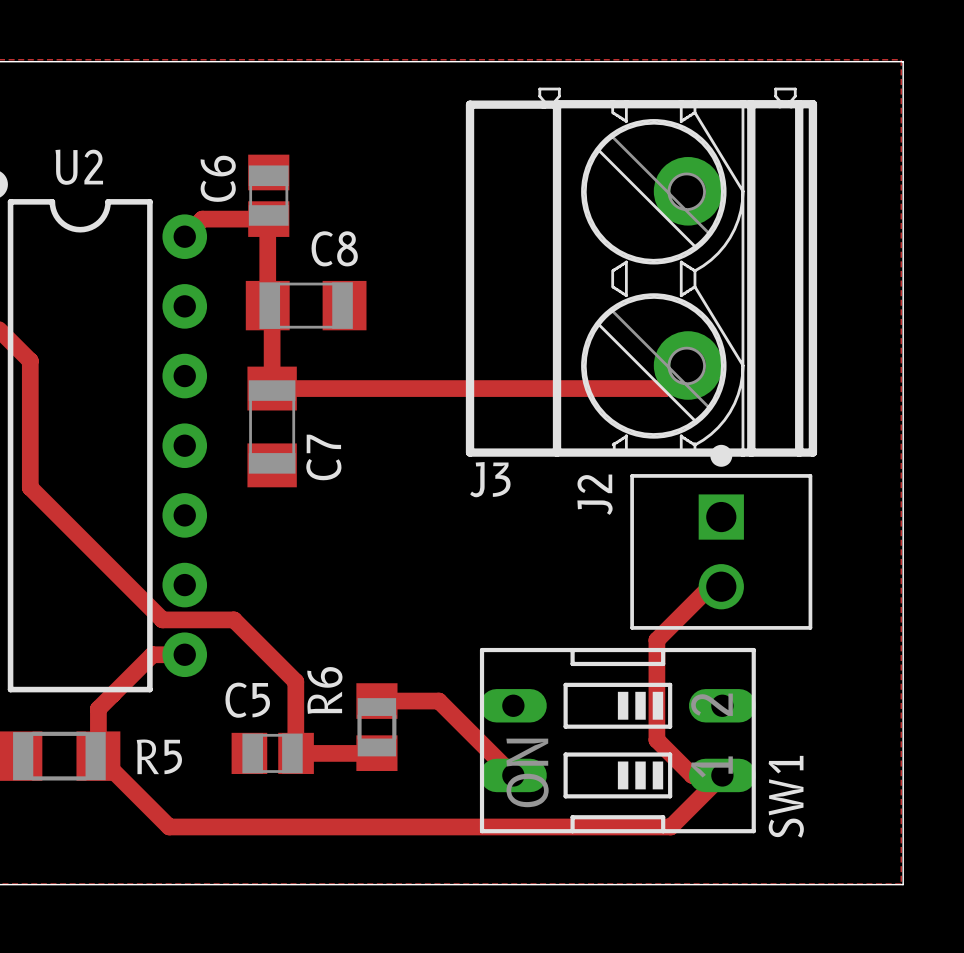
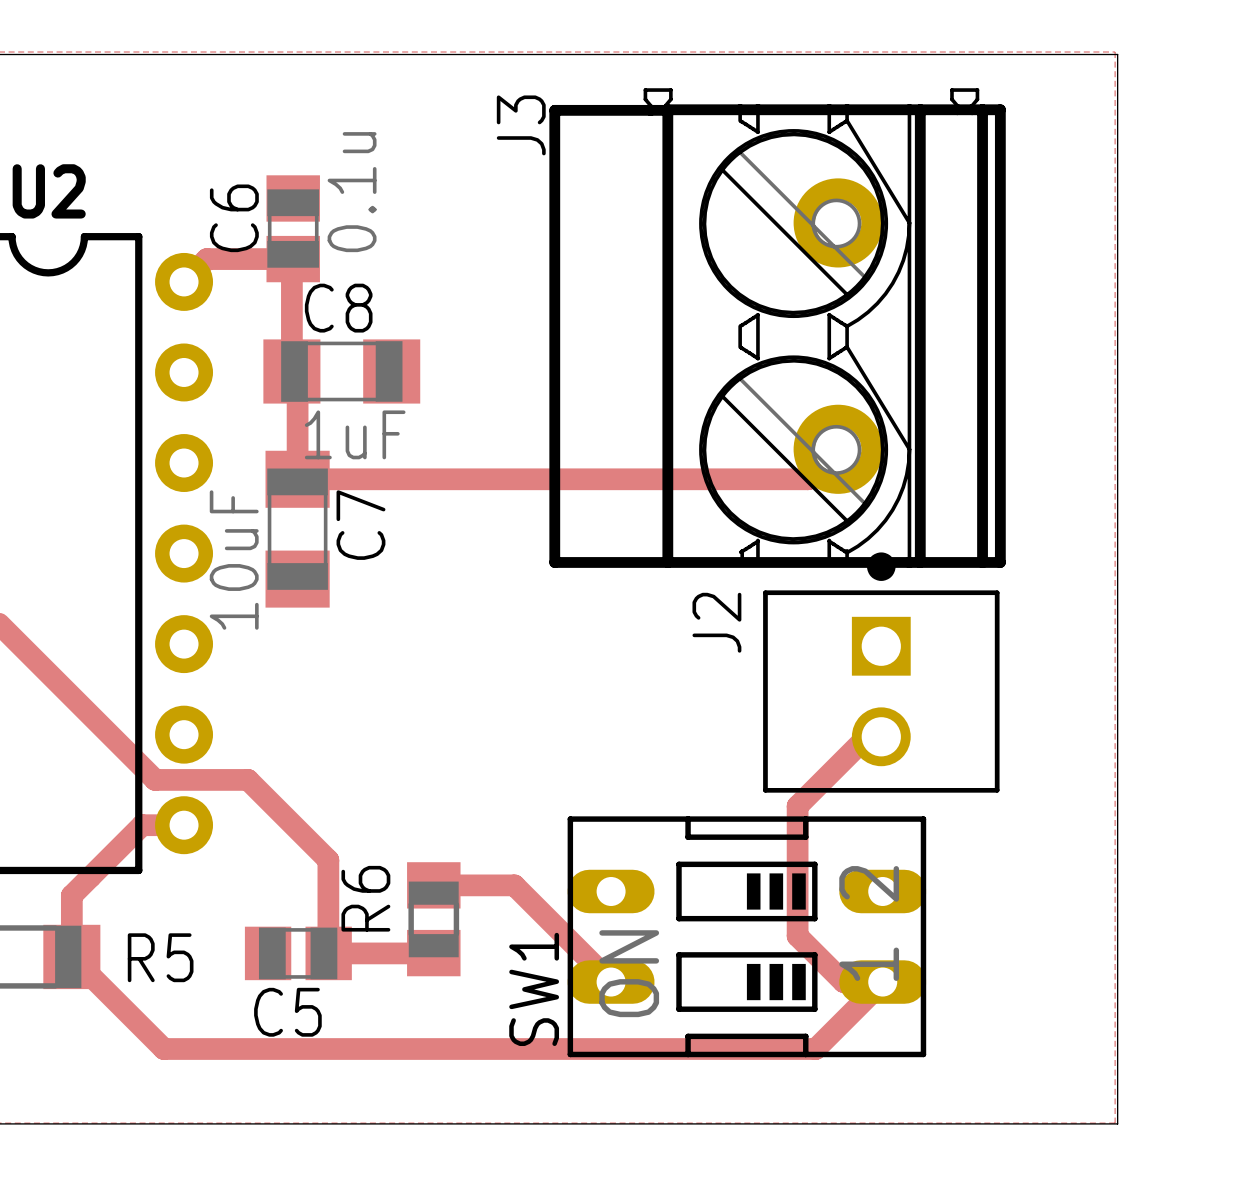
C6 value: none -> 0.1u (352, 192)
C6 name position: C6 (218, 178) -> C6 (234, 218)
C8 name position: C8 (334, 248) -> C8 (338, 308)
C8 value: none -> 1uF (355, 434)
C7 value: none -> 10uF (234, 560)
C7 name position: C7 (323, 457) -> C7 (360, 525)
J3 name rotation: 0° (490, 479) -> 90° counterclockwise (521, 125)
J3 name position: J3 (490, 479) -> J3 (521, 125)
R6 name position: R6 (324, 690) -> R6 (365, 898)
C5 name position: C5 (247, 700) -> C5 (287, 1012)
SW1 name position: SW1 (786, 796) -> SW1 (534, 989)

